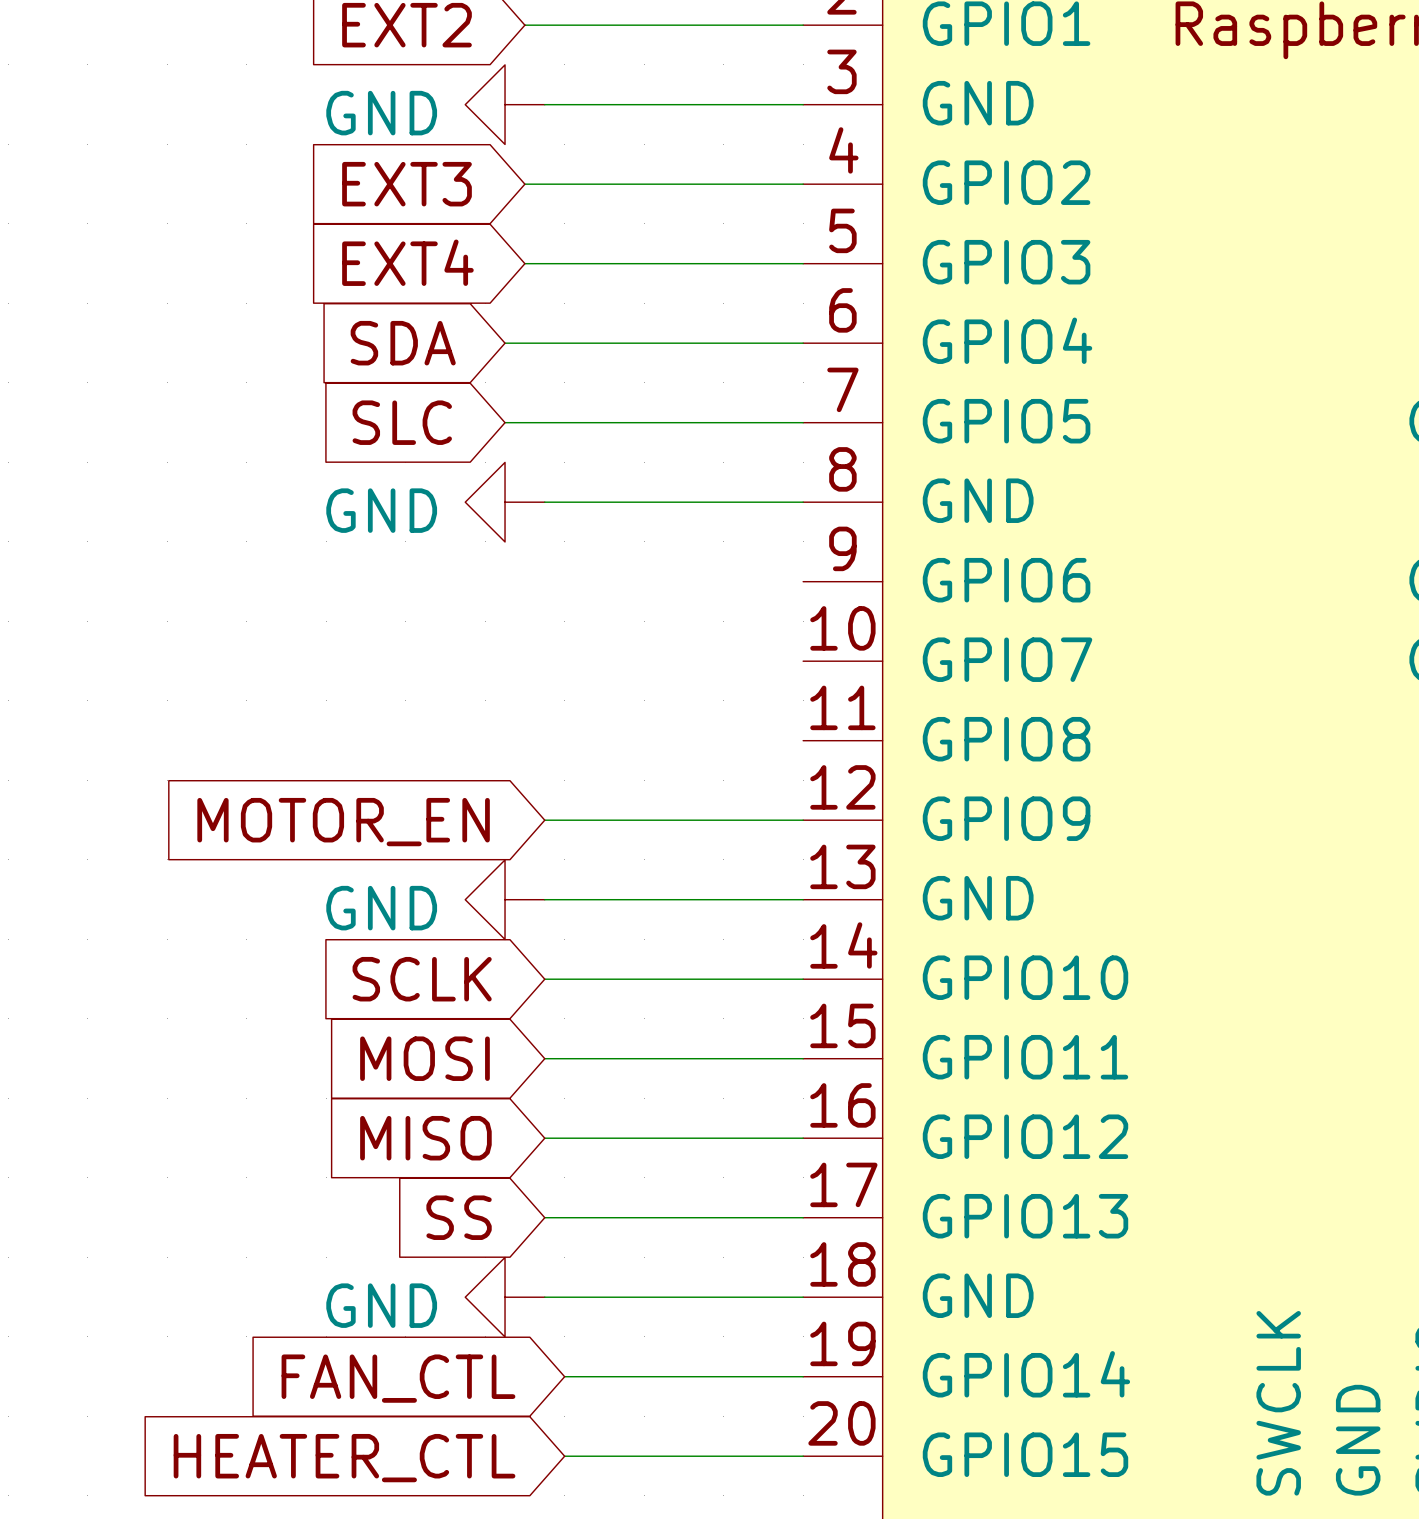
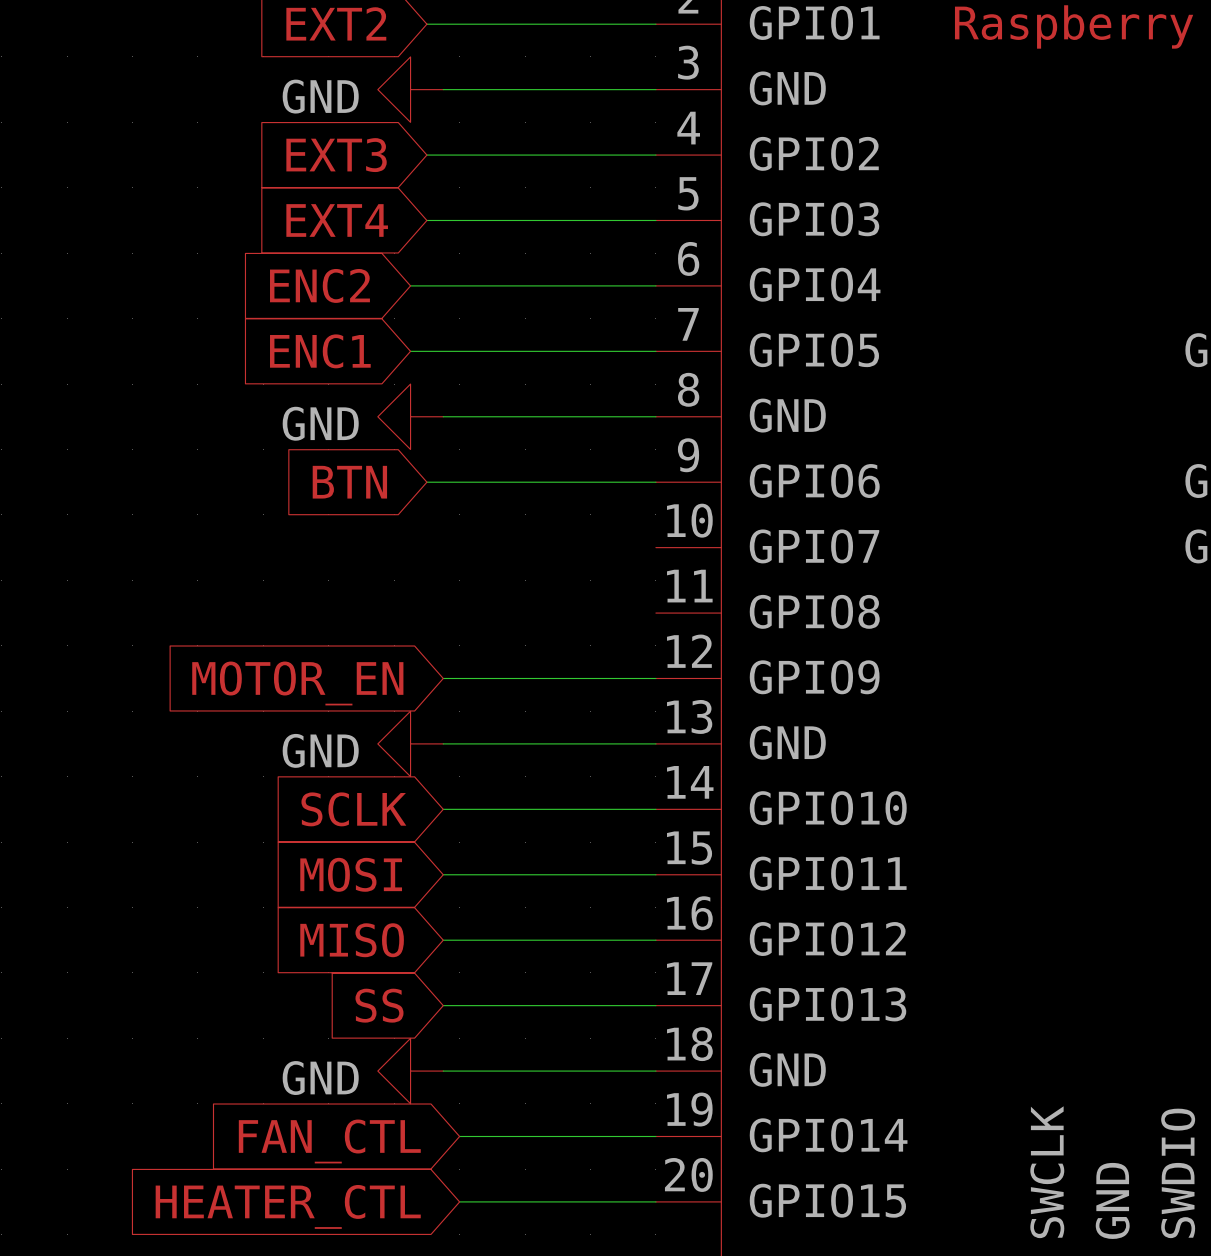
global label: SDA (403, 343) -> ENC2 (319, 285)
global label: SLC (402, 422) -> ENC1 (320, 351)
global label: none -> BTN (349, 482)
wire: none -> (426, 482) (655, 482)

